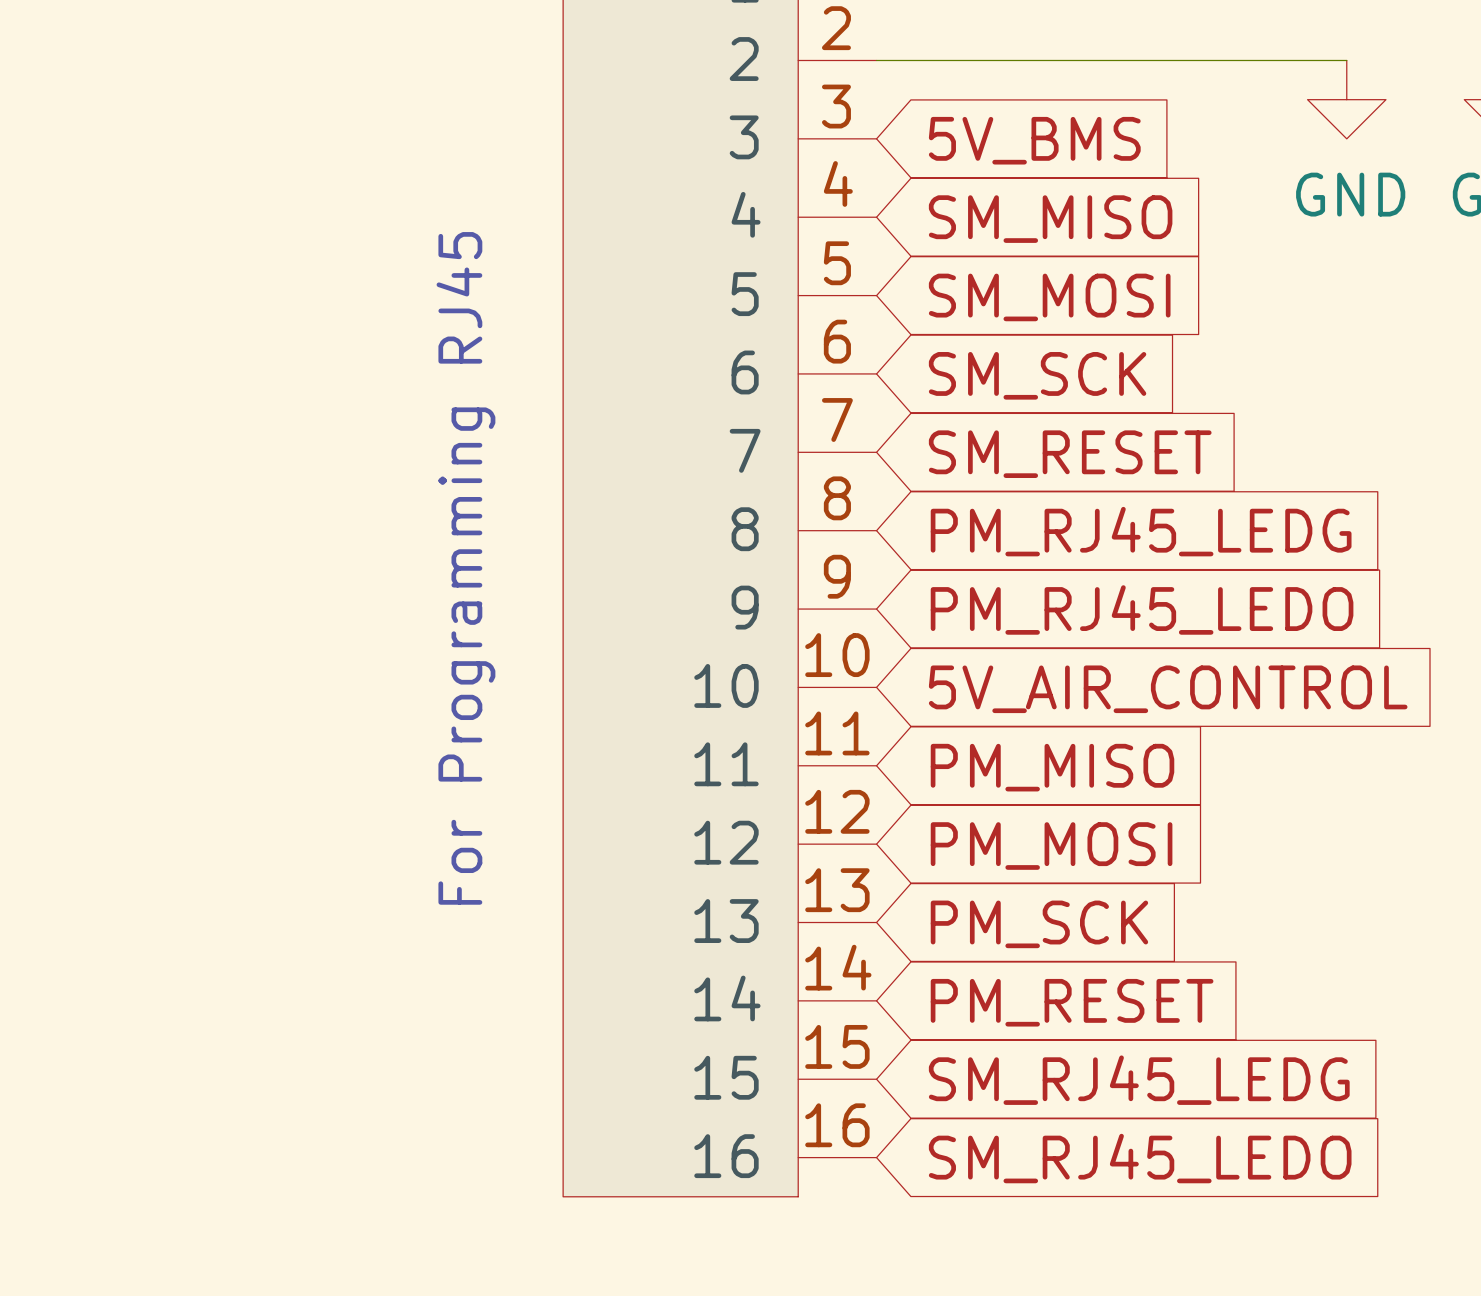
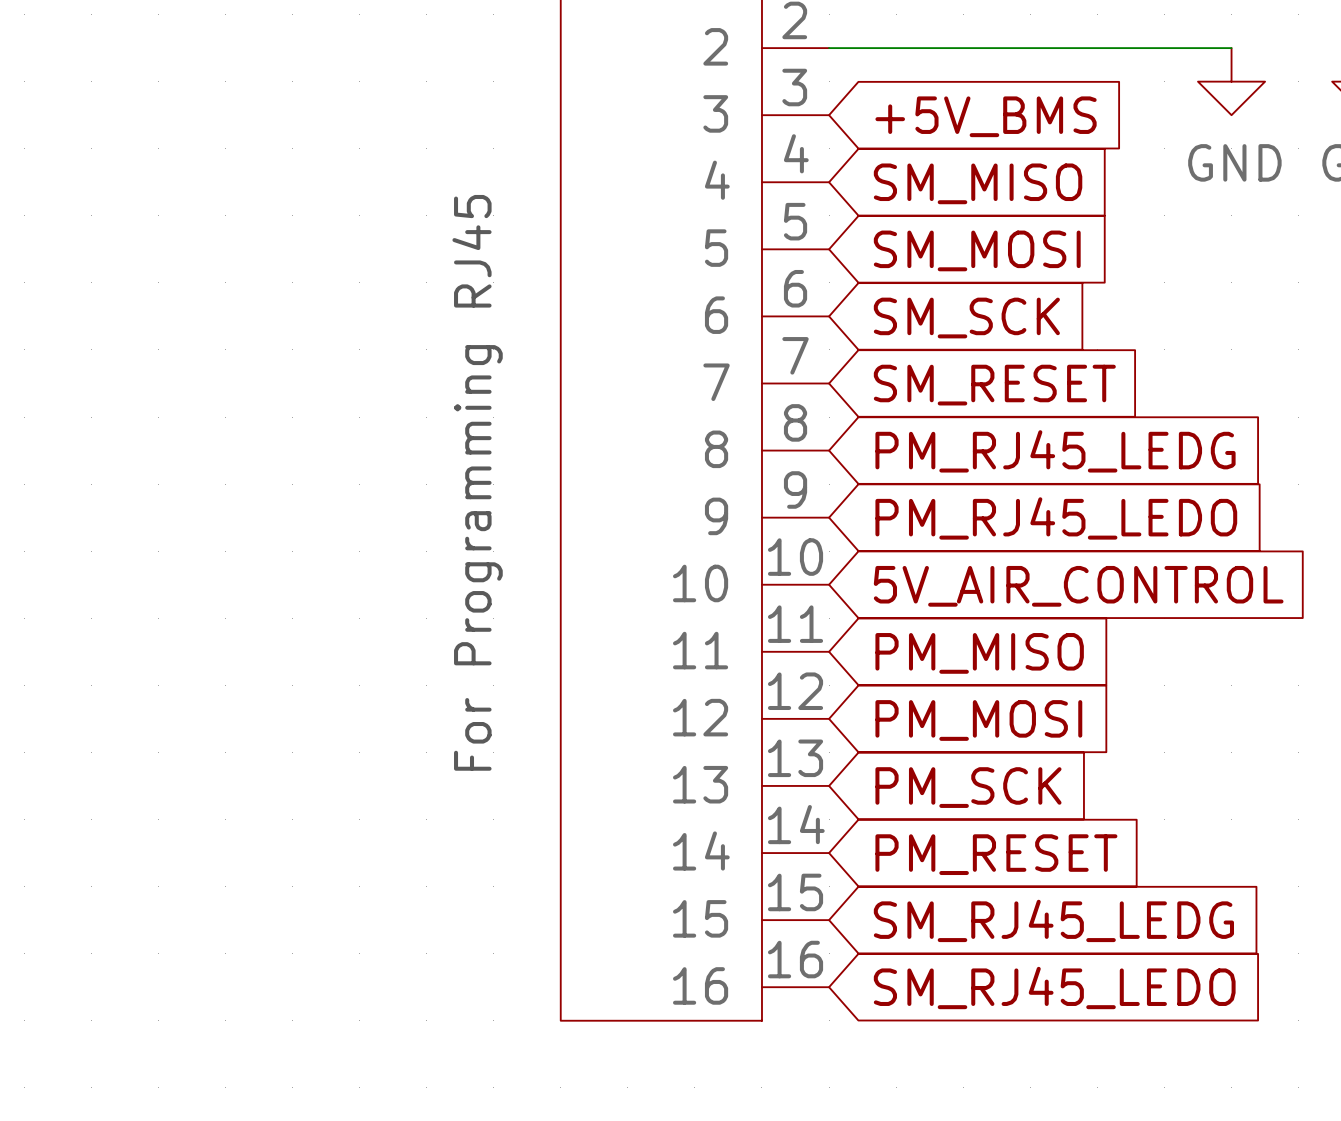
global label: 5V_BMS (1034, 140) -> +5V_BMS (986, 116)

